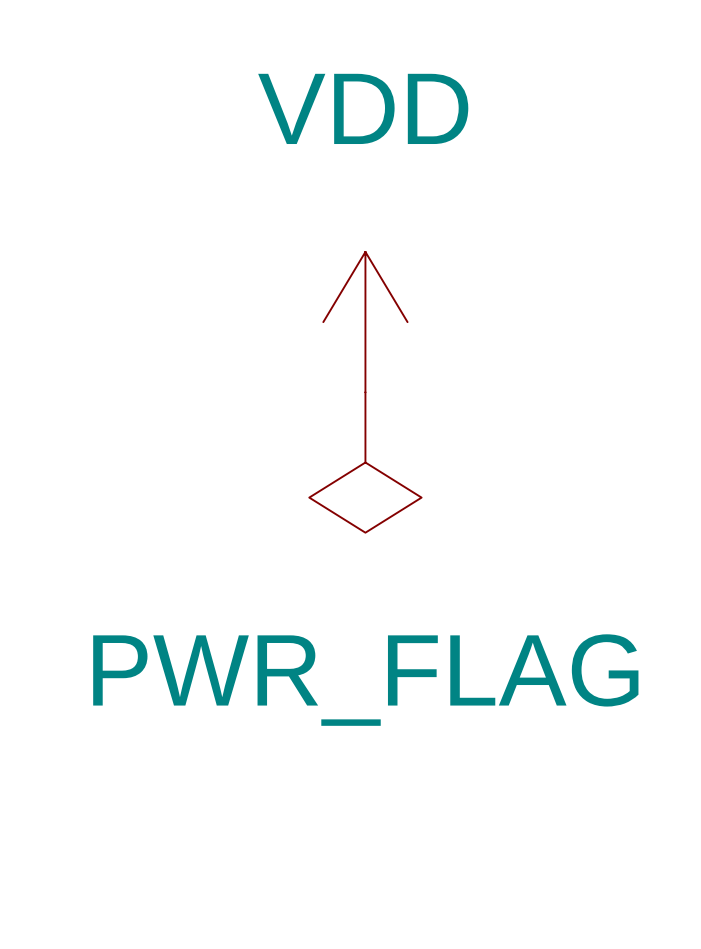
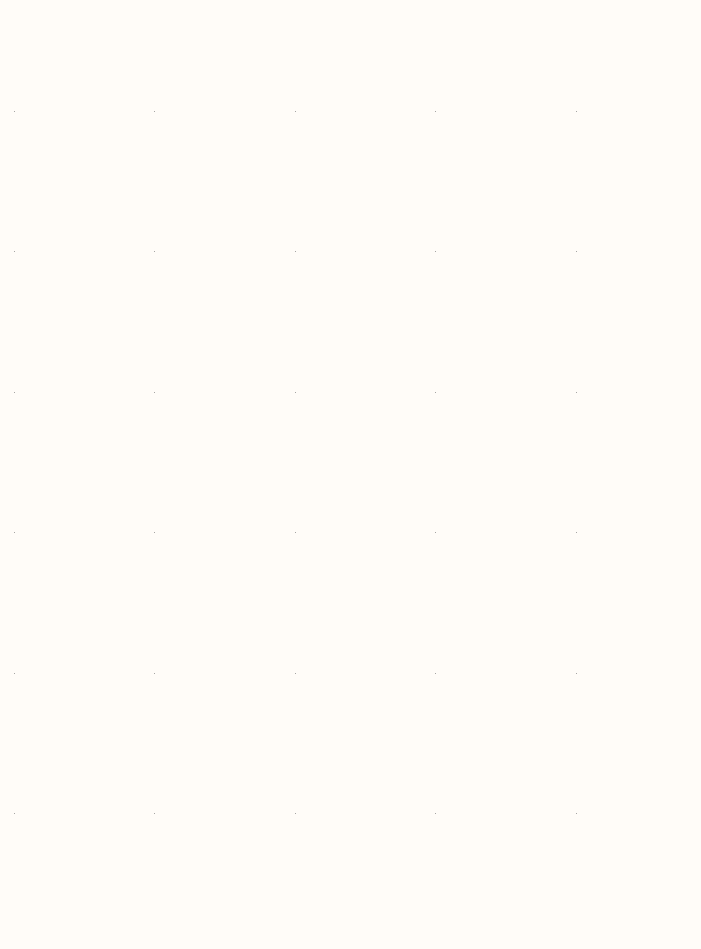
power symbol: VDD (365, 322) -> none
power symbol: PWR_FLAG (365, 462) -> none

